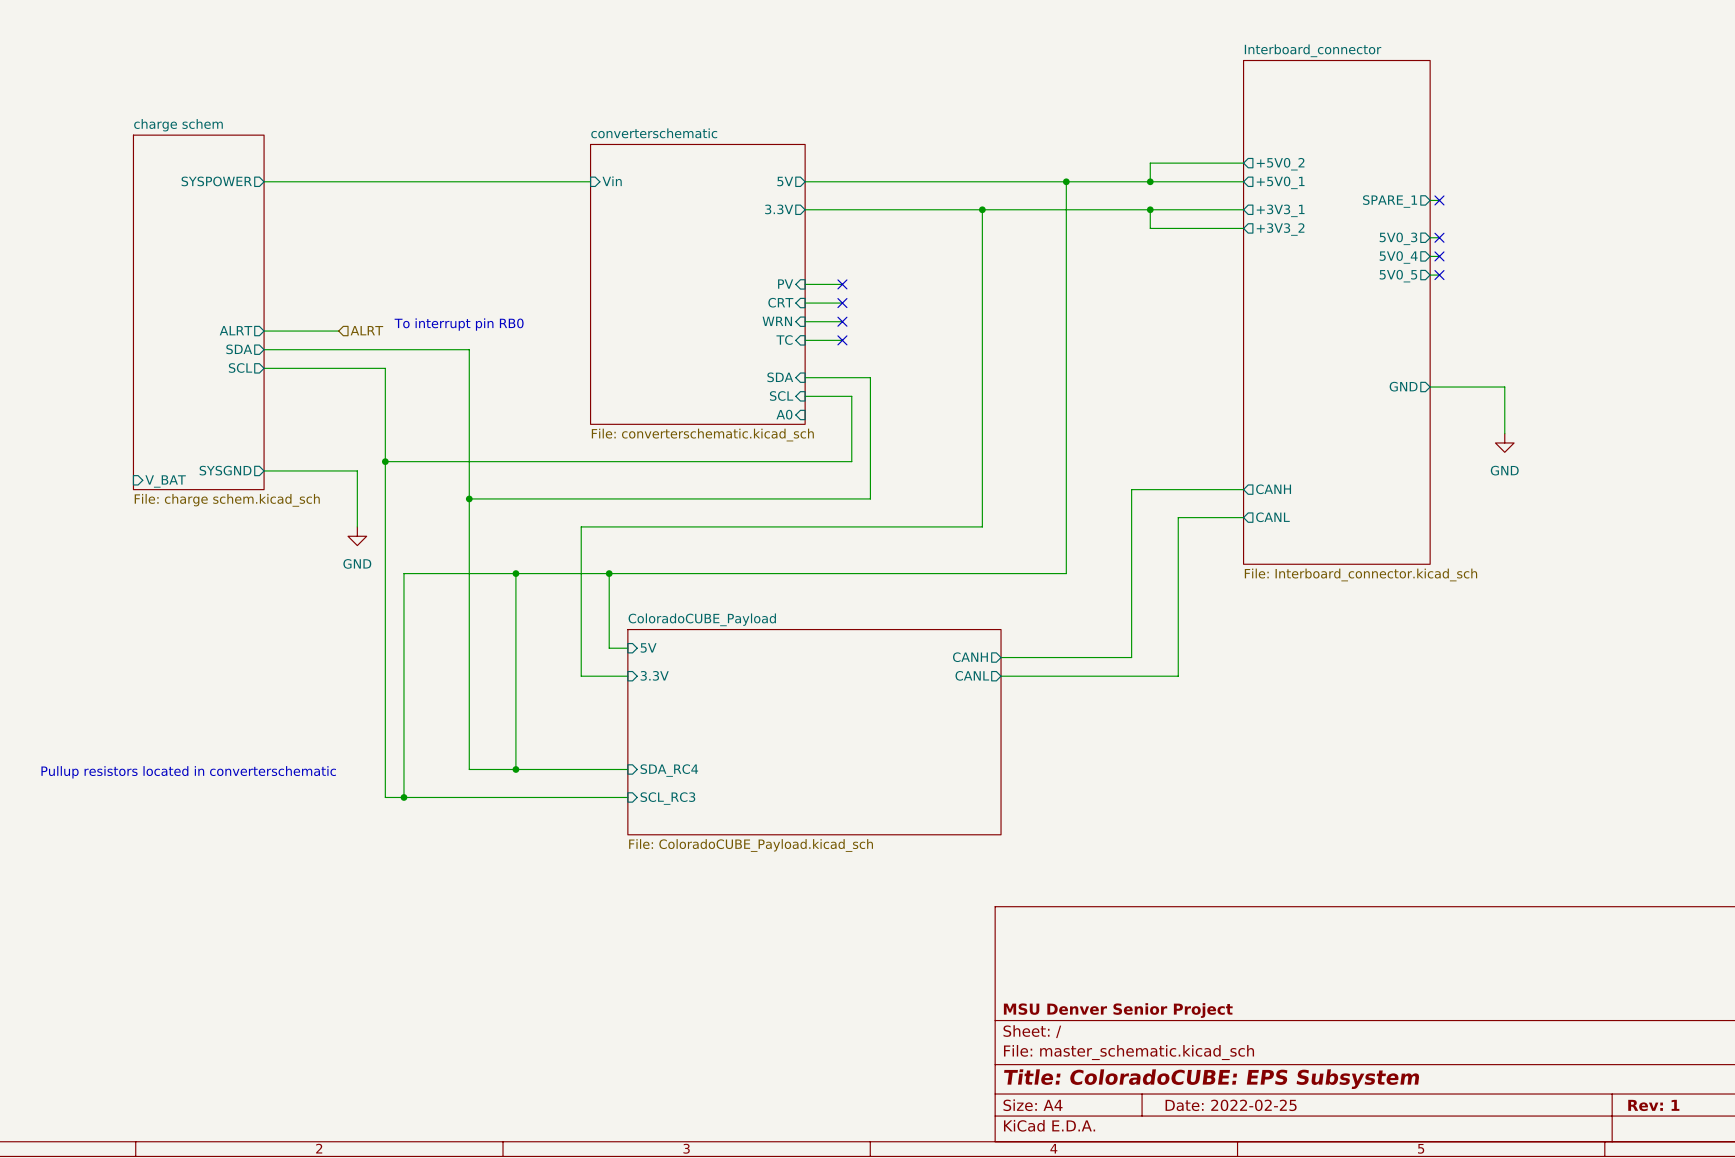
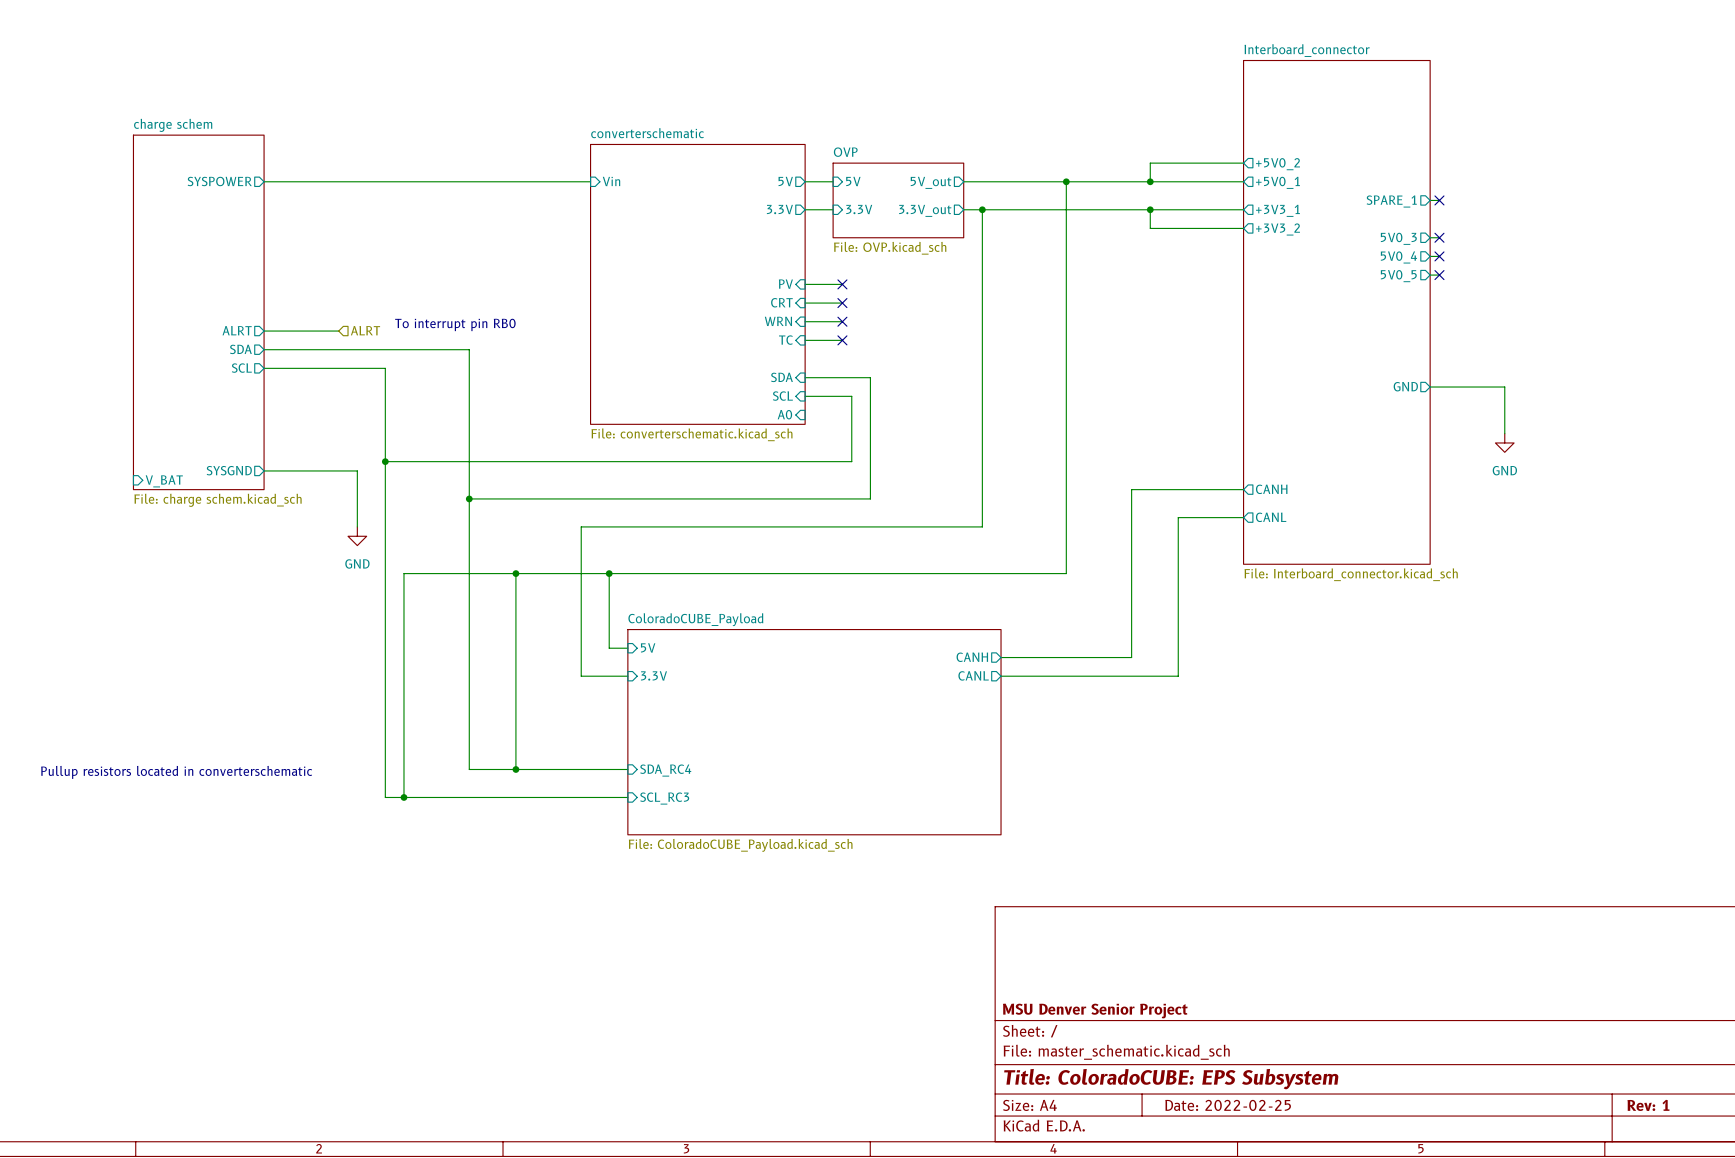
wire: (833, 181) (963, 181) -> none
sheet pin: none -> 5V (853, 181)
sheet pin: none -> 5V_out (931, 182)
sheet OVP: none -> File: OVP.kicad_sch (898, 200)
wire: (833, 209) (963, 209) -> none
sheet pin: none -> 3.3V (859, 209)
sheet pin: none -> 3.3V_out (925, 210)

